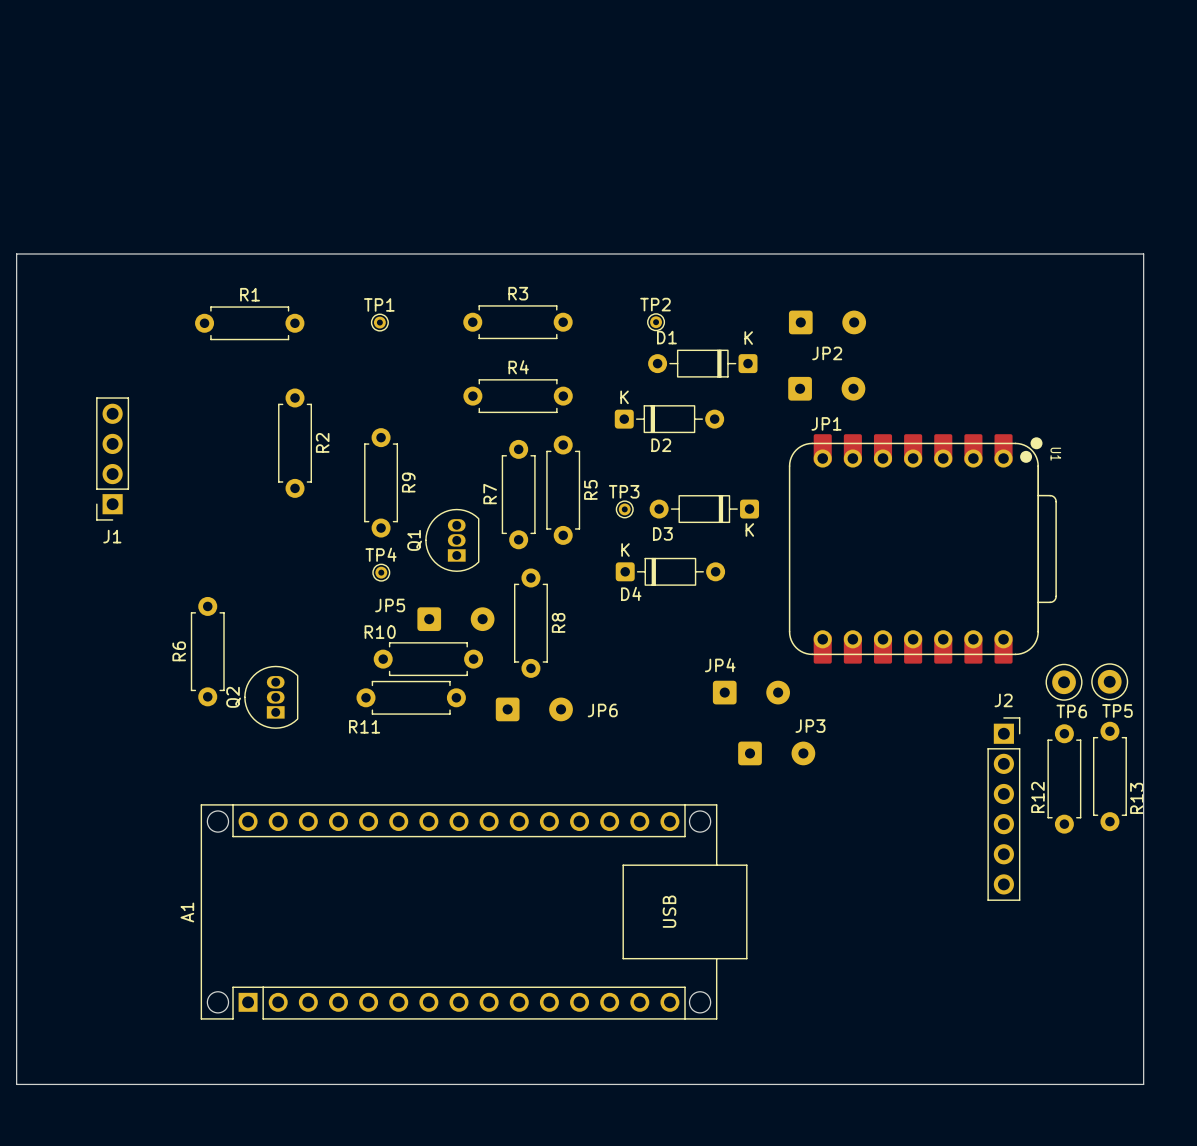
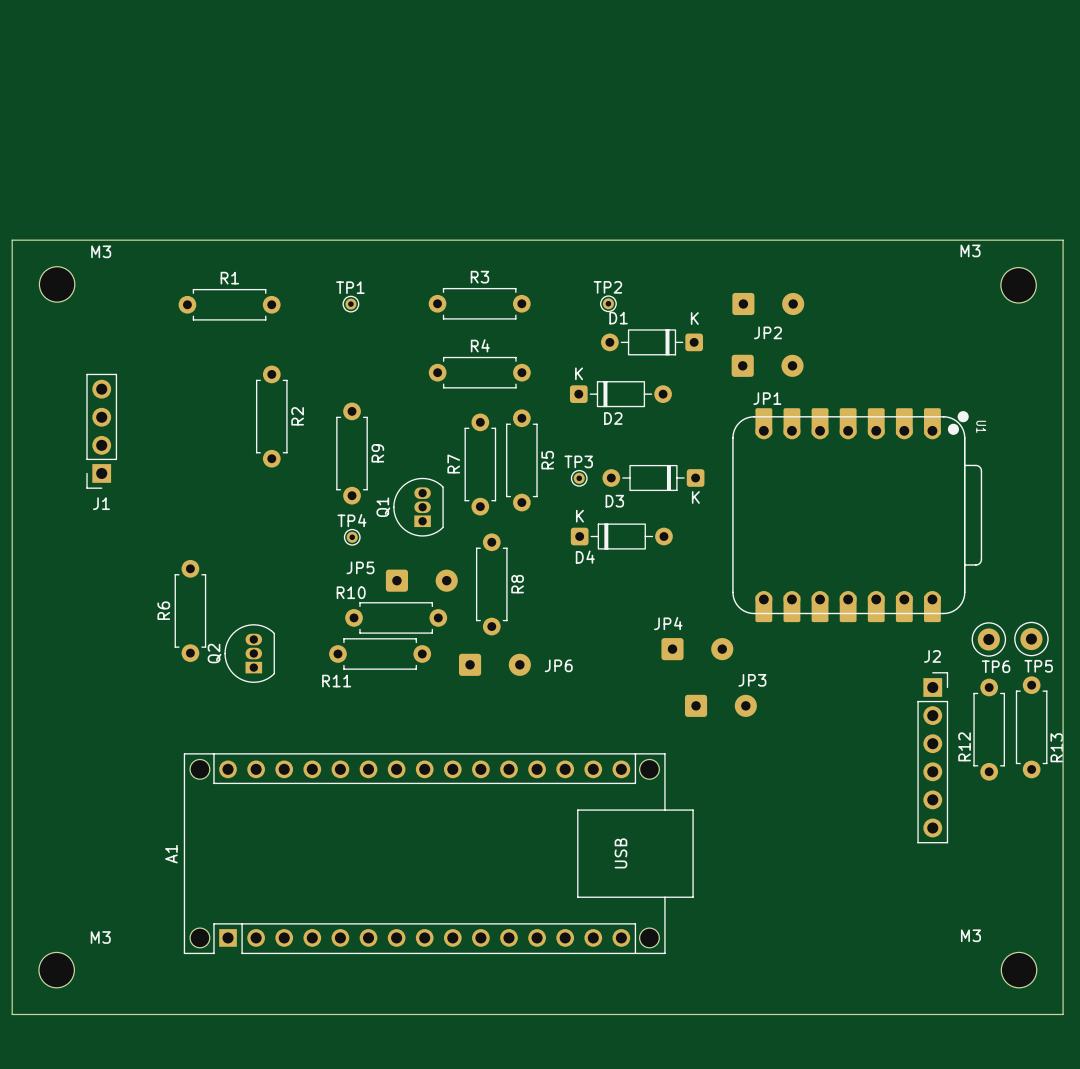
M3: none -> (57, 284)
M3: none -> (1018, 285)
M3: none -> (56, 970)
M3: none -> (1019, 970)

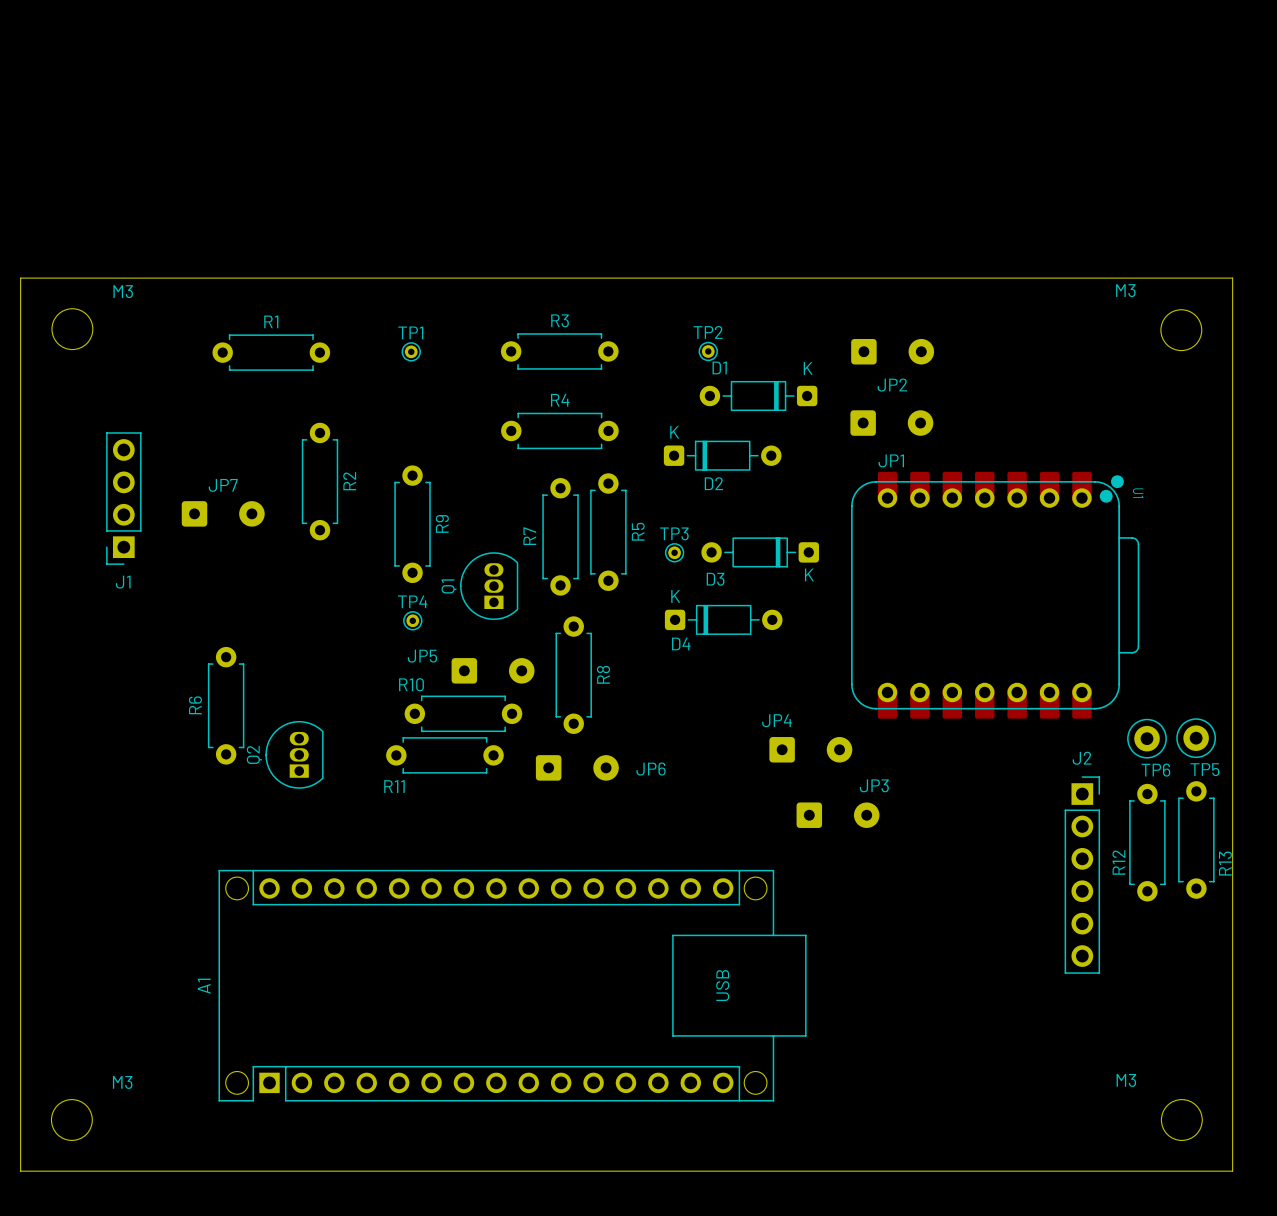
JP7: none -> (223, 513)

